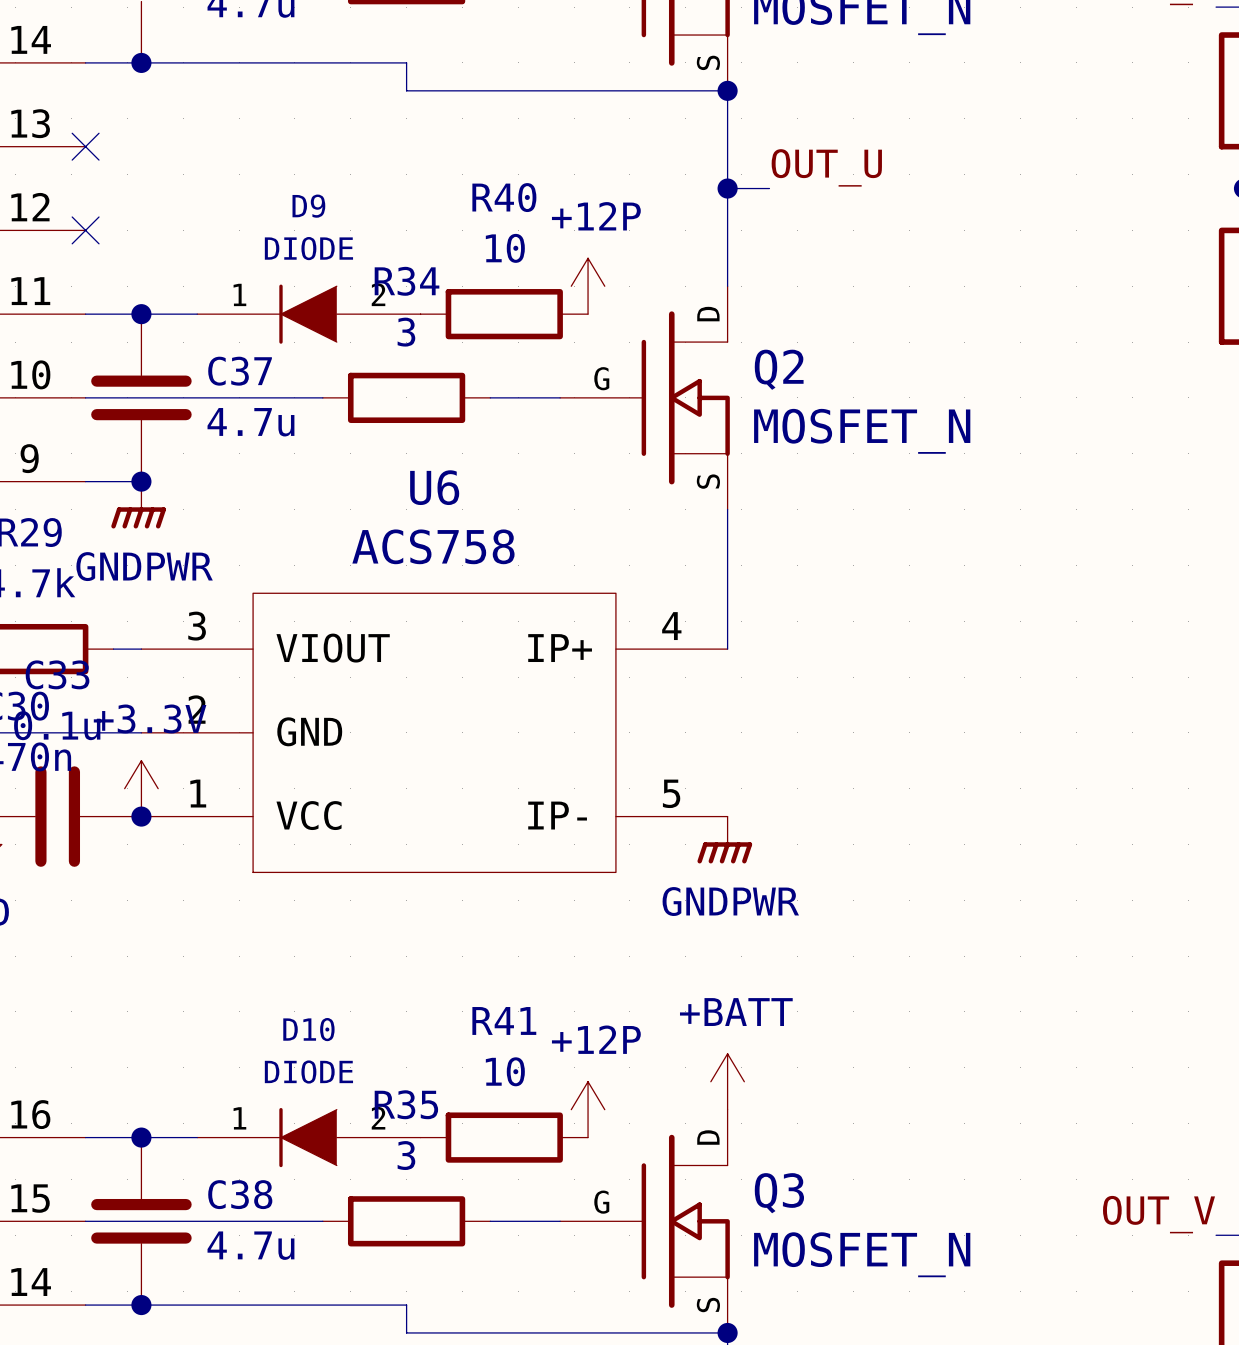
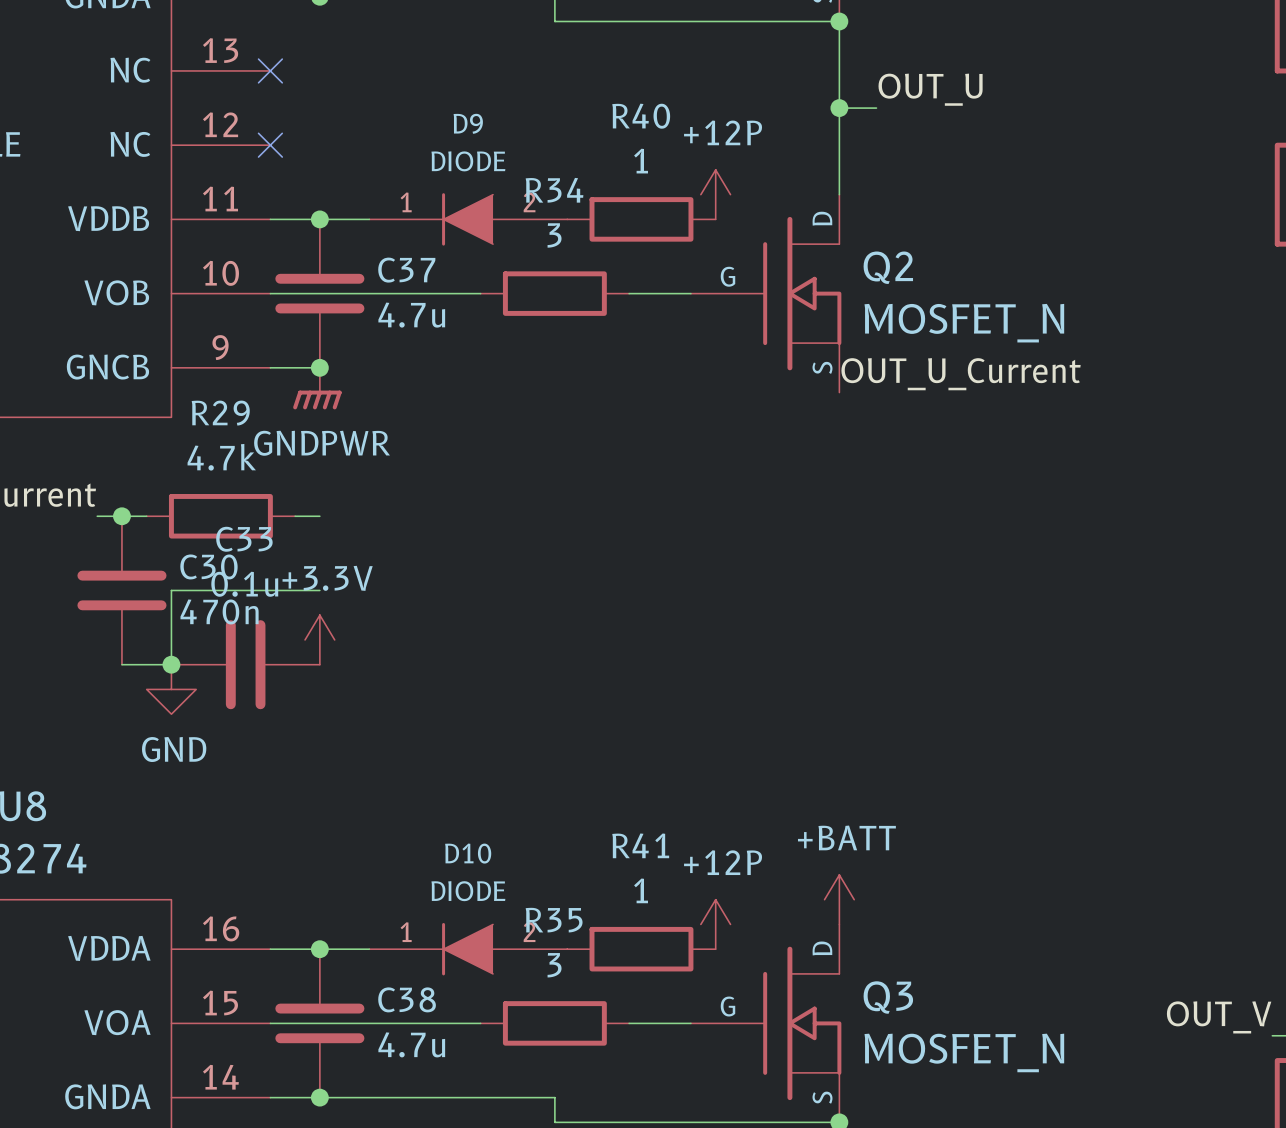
R40 value: 10 (505, 248) -> 1 (641, 161)
label: none -> OUT_U_Current (961, 374)
wire: (727, 509) (727, 649) -> none
U6: ACS758 (434, 732) -> none
junction: (141, 816) -> none
power symbol: GNDPWR (724, 840) -> none
R41 value: 10 (505, 1071) -> 1 (641, 890)

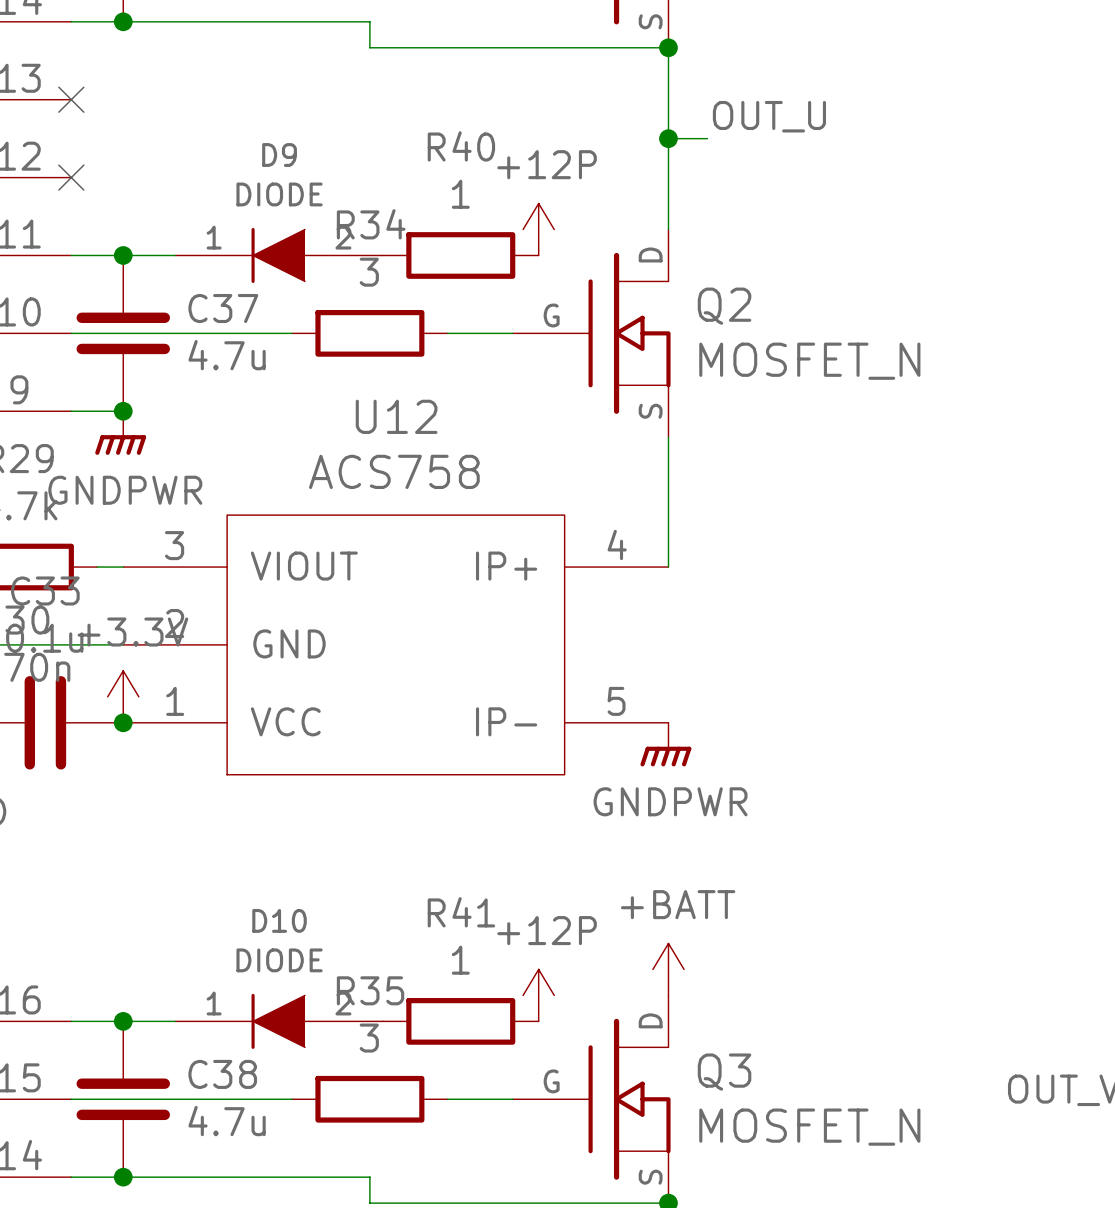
label: OUT_U_Current (961, 374) -> none
wire: none -> (668, 437) (668, 567)
U12: none -> ACS758 (395, 644)
junction: none -> (123, 722)
power symbol: none -> GNDPWR (665, 744)

